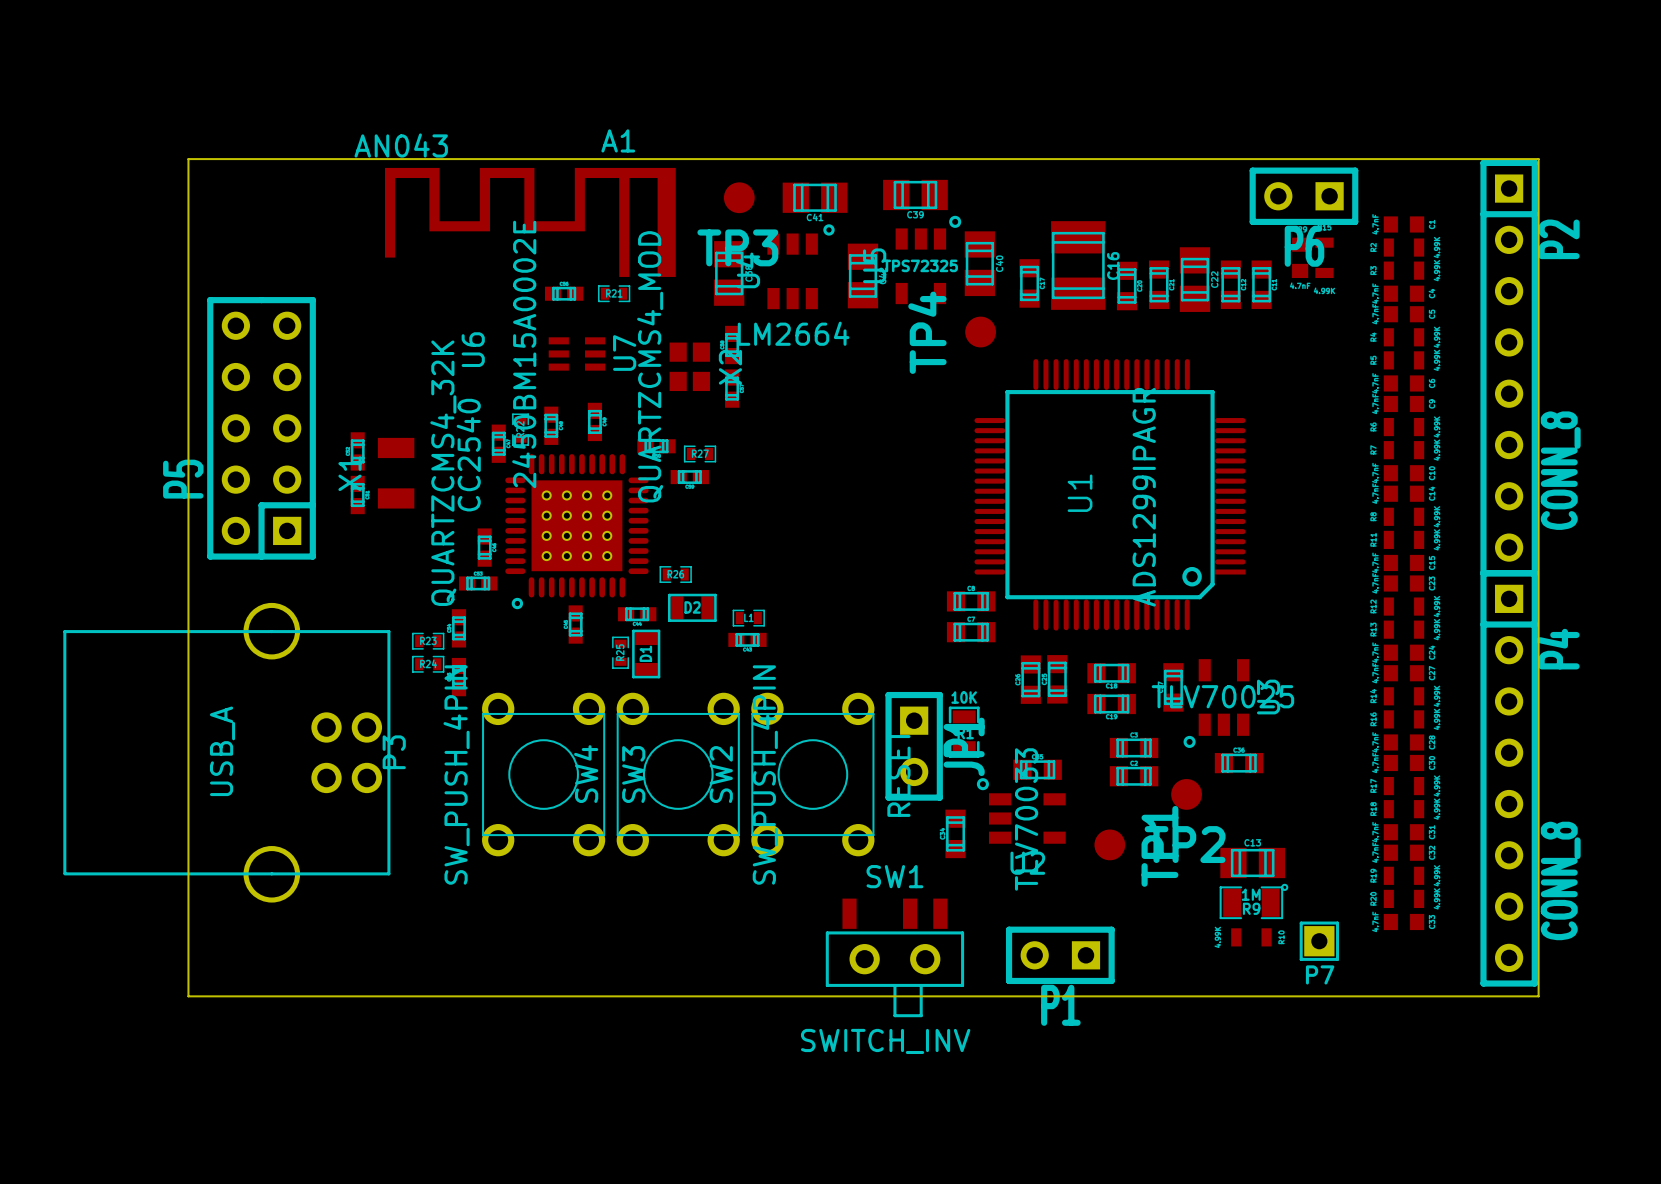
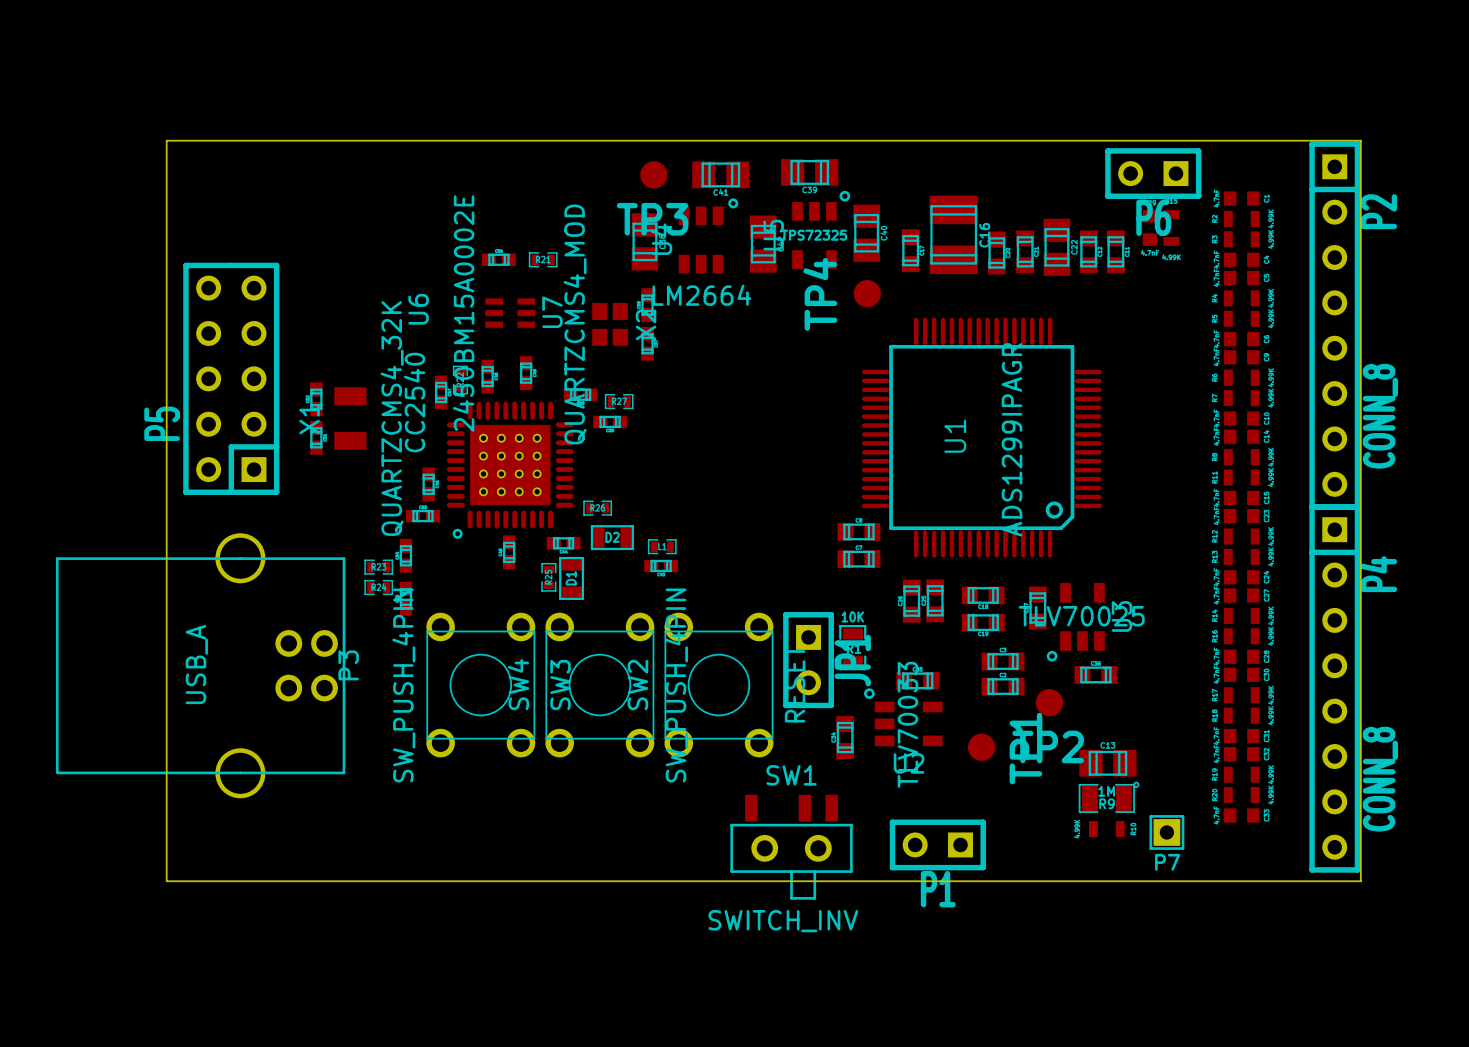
A1: AN043 (530, 222) -> none

